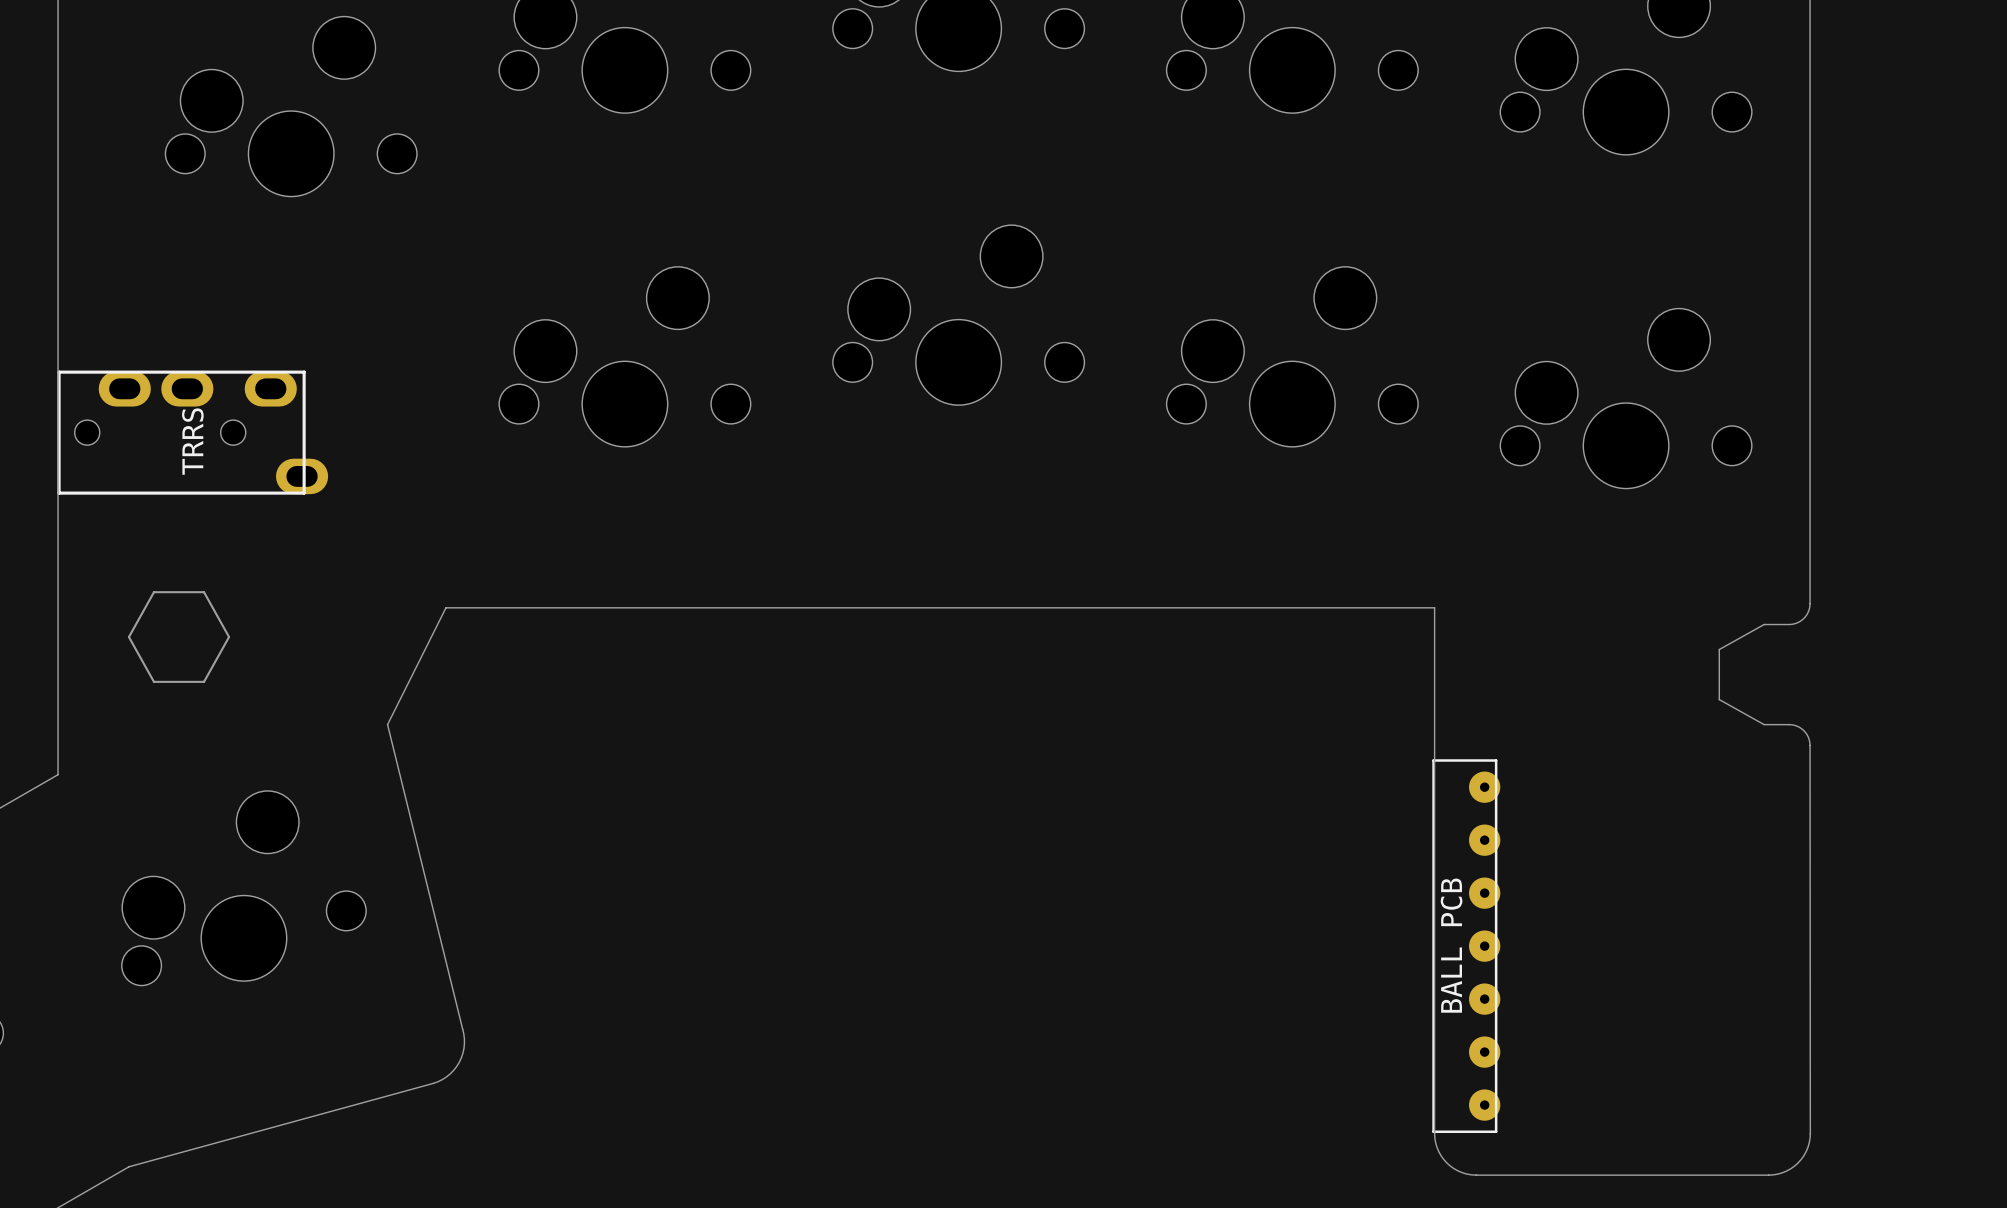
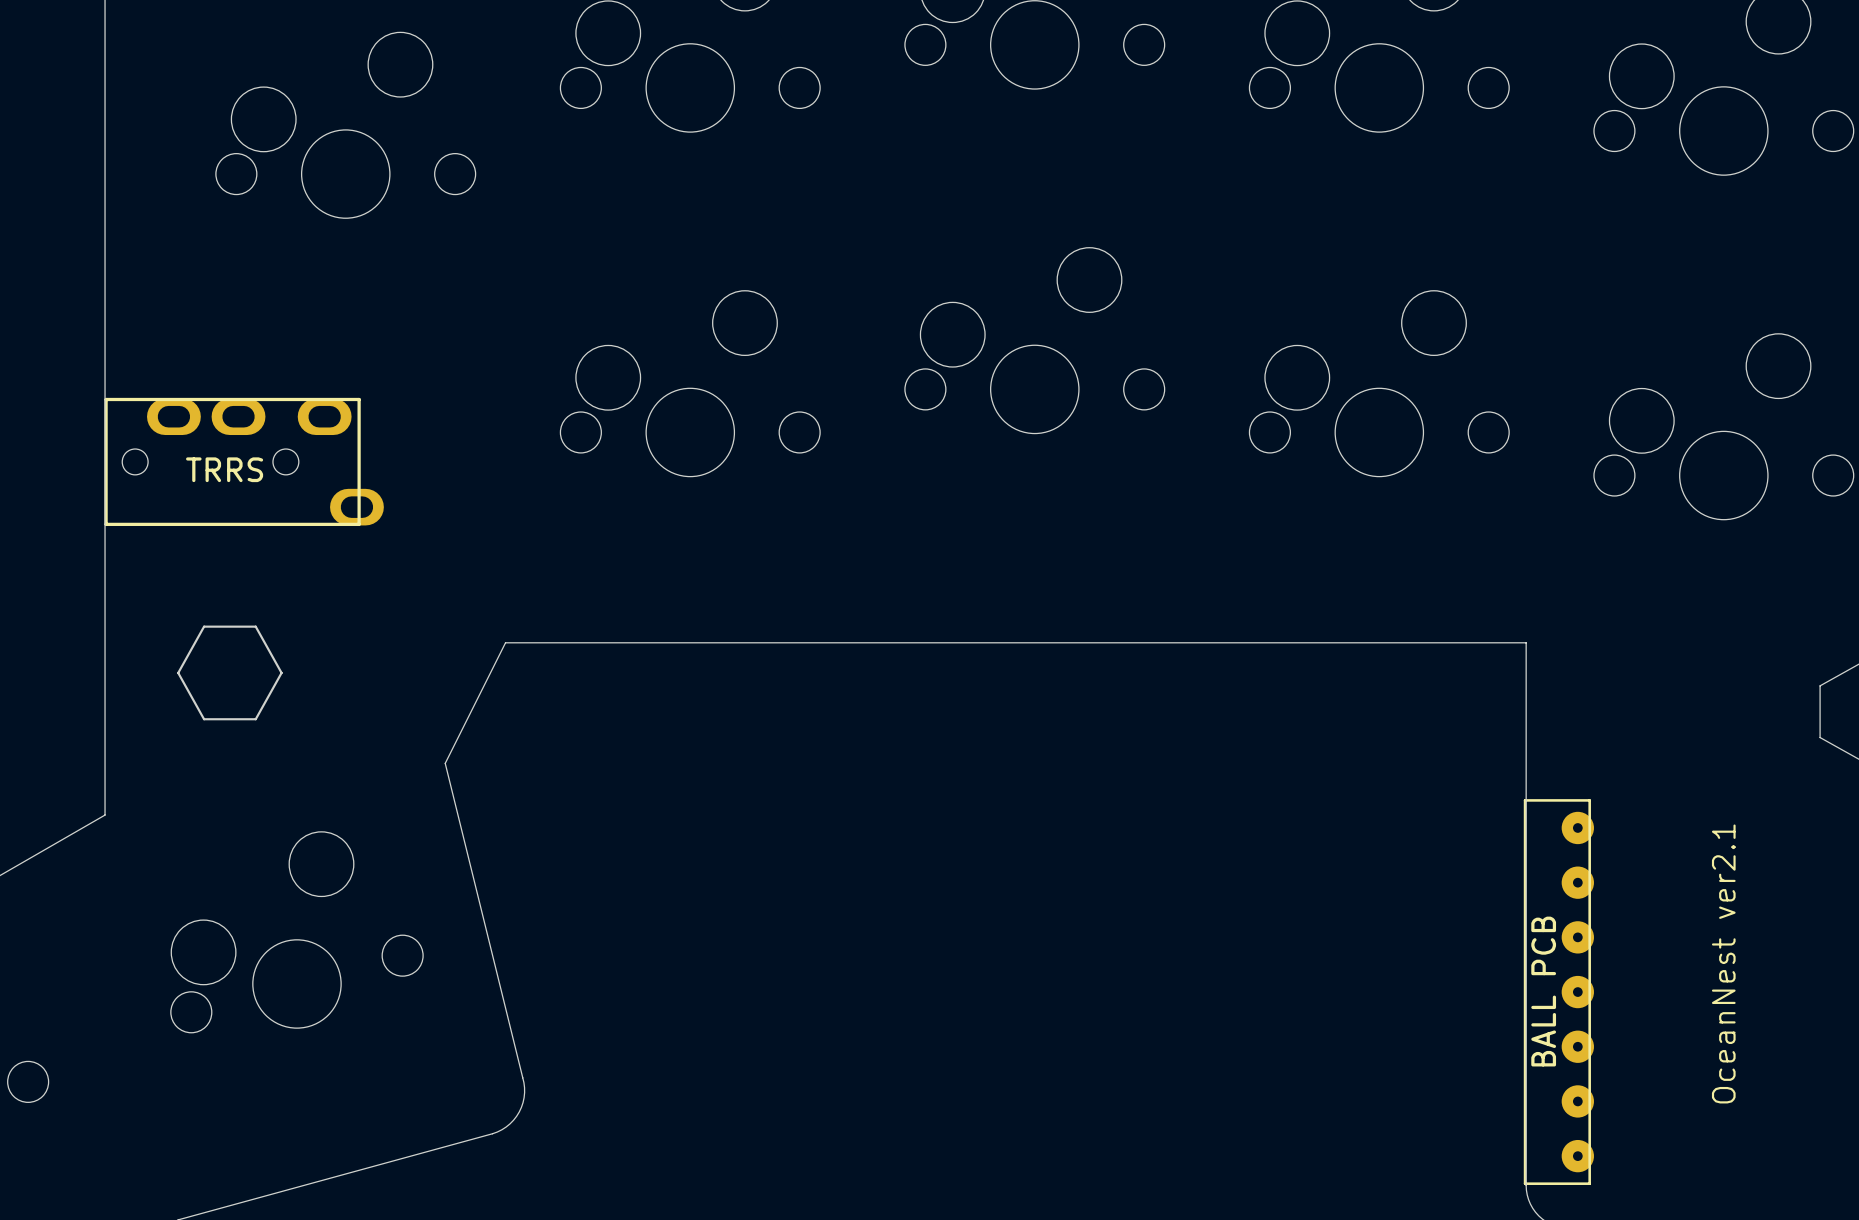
part text rotation: 0° (192, 441) -> 90° clockwise (224, 469)
text: none -> OceanNest ver2.1 (1723, 963)

